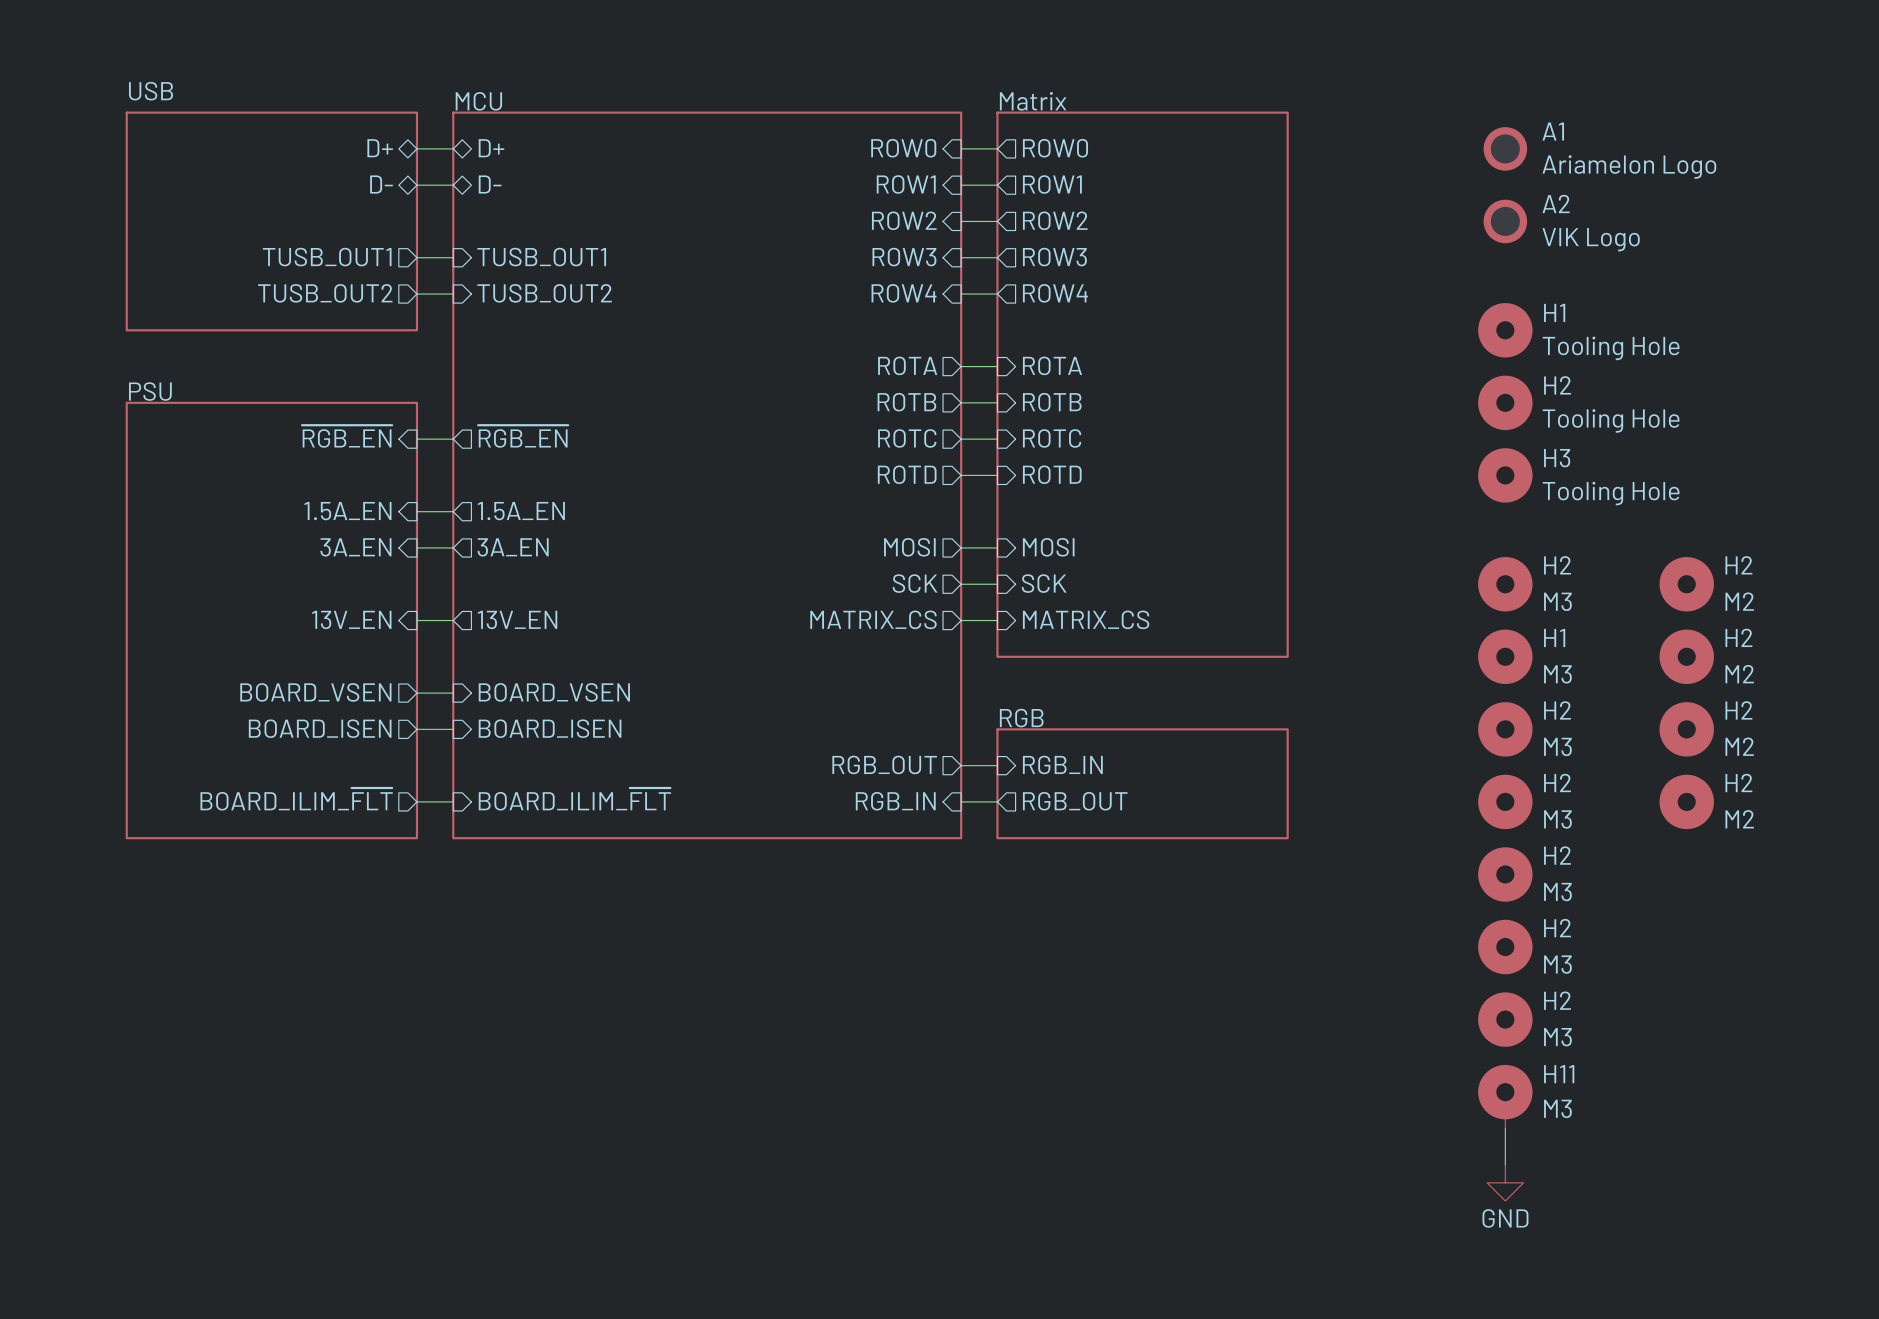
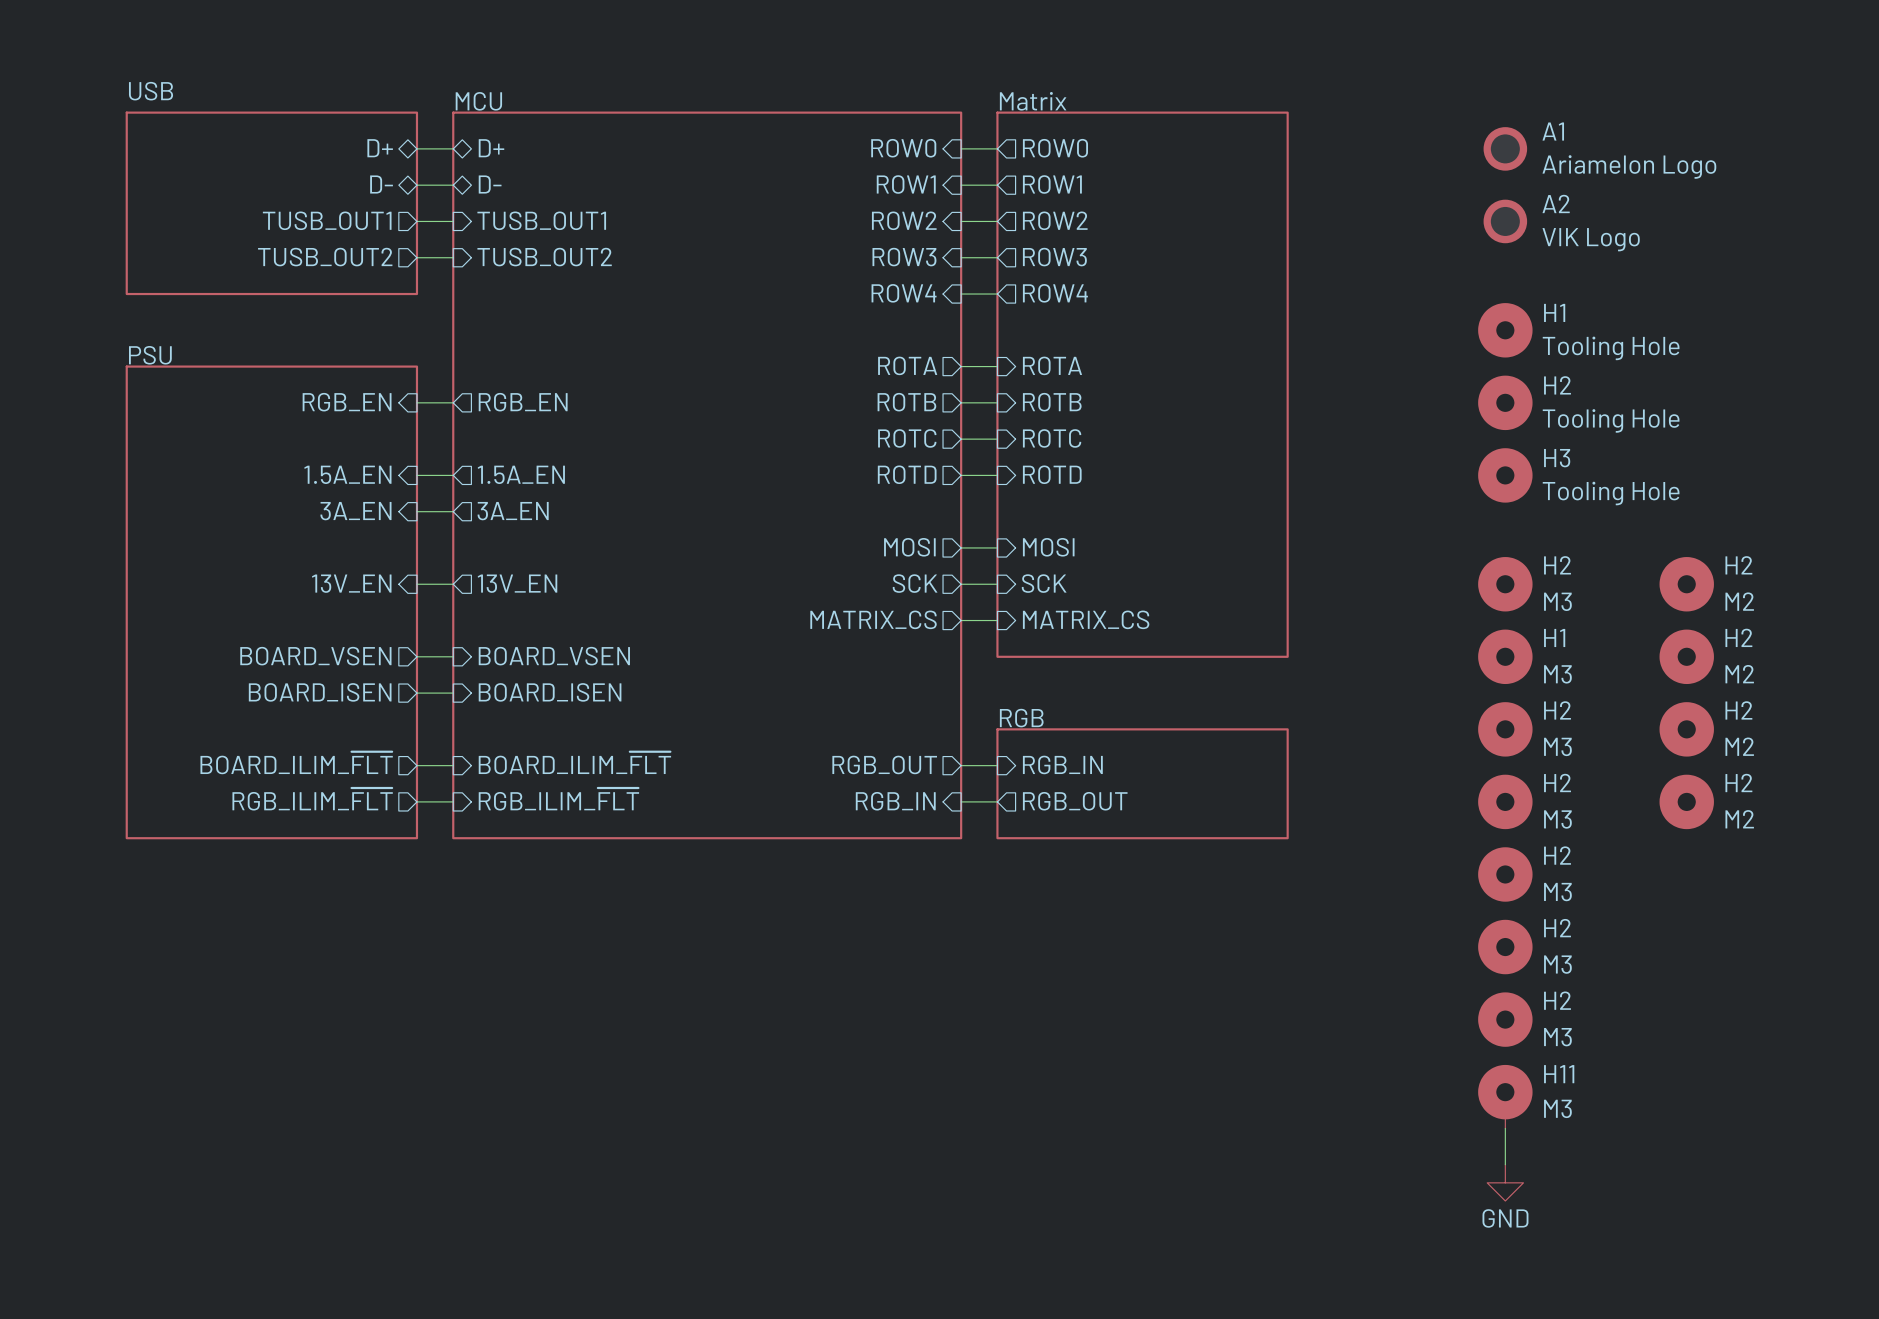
sheet USB: none -> (271, 203)
sheet pin: none -> TUSB_OUT1 (327, 220)
sheet pin: none -> TUSB_OUT1 (541, 220)
sheet USB: (271, 221) -> none
sheet pin: TUSB_OUT1 (327, 257) -> TUSB_OUT2 (325, 257)
sheet pin: TUSB_OUT1 (541, 257) -> TUSB_OUT2 (544, 257)
sheet pin: TUSB_OUT2 (325, 293) -> none
sheet pin: TUSB_OUT2 (544, 293) -> none
wire: (416, 294) (453, 294) -> (416, 221) (453, 221)
wire: none -> (416, 402) (453, 402)
sheet pin: ~{RGB_EN} (347, 436) -> RGB_EN (347, 402)
sheet pin: ~{RGB_EN} (523, 436) -> RGB_EN (523, 402)
wire: (416, 439) (453, 439) -> (416, 475) (453, 475)
sheet pin: none -> 1.5A_EN (347, 474)
sheet pin: none -> 1.5A_EN (521, 474)
sheet pin: 1.5A_EN (347, 511) -> 3A_EN (355, 511)
sheet pin: 1.5A_EN (521, 511) -> 3A_EN (513, 511)
sheet pin: 3A_EN (355, 547) -> none
wire: (416, 547) (453, 547) -> (416, 584) (453, 584)
sheet pin: 3A_EN (513, 547) -> none
sheet PSU: none -> (271, 602)
sheet pin position: 13V_EN (351, 619) -> 13V_EN (351, 583)
sheet pin position: 13V_EN (517, 619) -> 13V_EN (517, 583)
sheet PSU: (271, 620) -> none
wire: (416, 620) (453, 620) -> (416, 656) (453, 656)
sheet pin: none -> BOARD_VSEN (315, 656)
sheet pin: none -> BOARD_VSEN (554, 656)
sheet pin: BOARD_VSEN (315, 692) -> BOARD_ISEN (320, 692)
sheet pin: BOARD_VSEN (554, 692) -> BOARD_ISEN (550, 692)
sheet pin: BOARD_ISEN (320, 728) -> none
sheet pin: BOARD_ISEN (550, 728) -> none
wire: (416, 729) (453, 729) -> (416, 765) (453, 765)
sheet pin: none -> BOARD_ILIM_~{FLT} (296, 762)
sheet pin: none -> BOARD_ILIM_~{FLT} (574, 762)
sheet pin: BOARD_ILIM_~{FLT} (296, 799) -> RGB_ILIM_~{FLT} (312, 799)
sheet pin: BOARD_ILIM_~{FLT} (574, 799) -> RGB_ILIM_~{FLT} (558, 799)

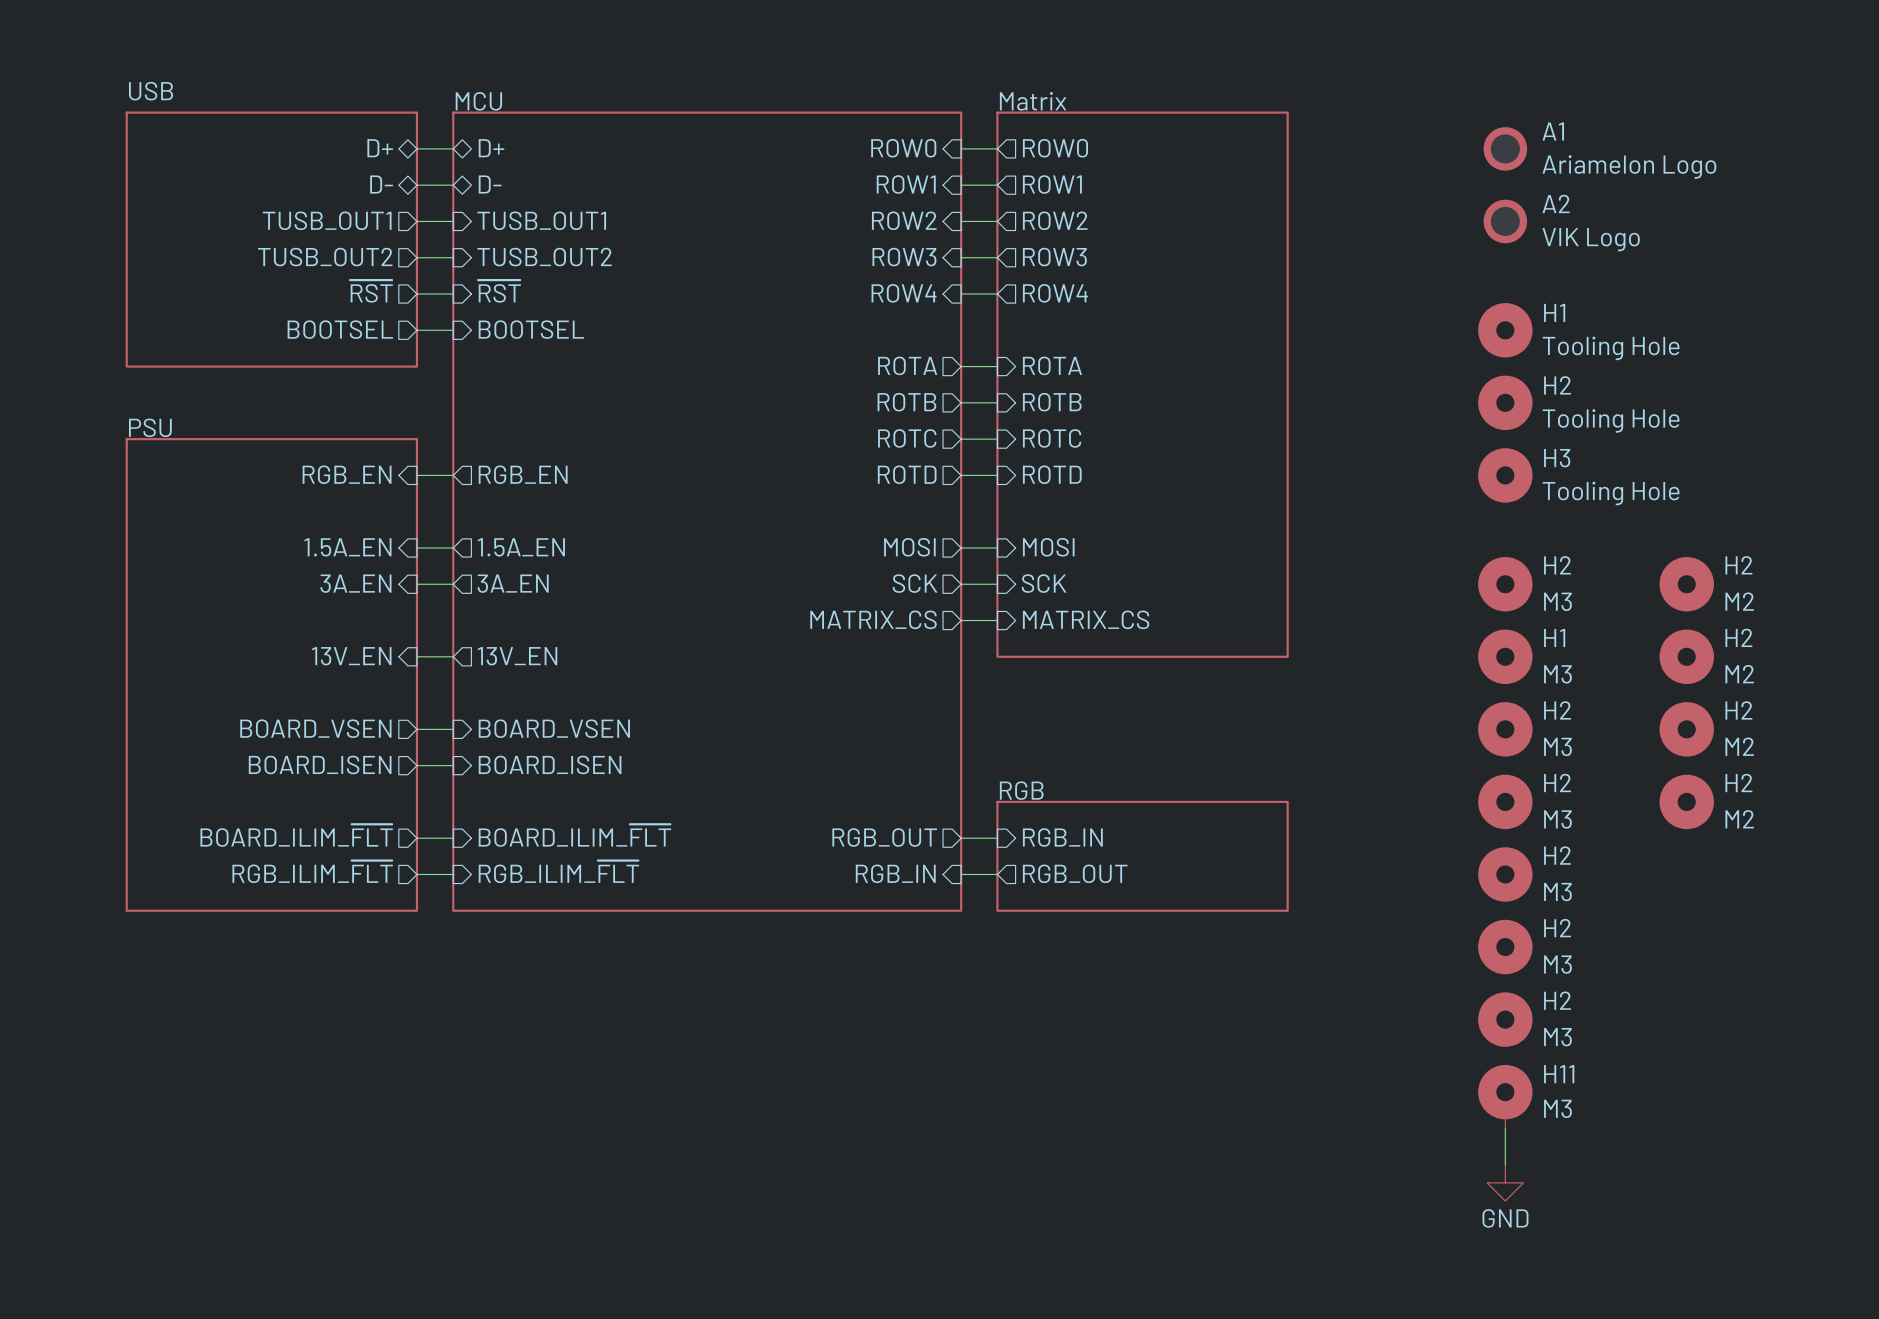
sheet USB: (271, 203) -> none
sheet USB: none -> (271, 239)
sheet pin: none -> ~{RST} (371, 291)
sheet pin: none -> ~{RST} (499, 291)
wire: none -> (416, 294) (453, 294)
sheet pin: none -> BOOTSEL (340, 329)
sheet pin: none -> BOOTSEL (531, 329)
sheet pin: RGB_EN (347, 402) -> none
wire: (416, 402) (453, 402) -> (416, 330) (453, 330)
sheet pin: RGB_EN (523, 402) -> none
sheet pin: 1.5A_EN (347, 474) -> RGB_EN (347, 474)
sheet pin: 1.5A_EN (521, 474) -> RGB_EN (523, 474)
sheet MCU: (707, 475) -> none
sheet pin: 3A_EN (355, 511) -> 1.5A_EN (347, 547)
wire: (416, 511) (453, 511) -> (416, 547) (453, 547)
sheet pin: 3A_EN (513, 511) -> 1.5A_EN (521, 547)
sheet MCU: none -> (707, 511)
sheet pin: 13V_EN (351, 583) -> 3A_EN (355, 583)
sheet pin: 13V_EN (517, 583) -> 3A_EN (513, 583)
sheet PSU position: (271, 602) -> (271, 674)
sheet pin shape: output (315, 656) -> input (351, 656)
sheet pin: BOARD_VSEN (315, 656) -> 13V_EN (351, 656)
sheet pin shape: input (554, 656) -> output (517, 656)
sheet pin: BOARD_VSEN (554, 656) -> 13V_EN (517, 656)
sheet pin: BOARD_ISEN (320, 692) -> BOARD_VSEN (315, 728)
sheet pin: BOARD_ISEN (550, 692) -> BOARD_VSEN (554, 728)
wire: (416, 693) (453, 693) -> (416, 729) (453, 729)
sheet pin: BOARD_ILIM_~{FLT} (296, 762) -> BOARD_ISEN (320, 764)
sheet pin: BOARD_ILIM_~{FLT} (574, 762) -> BOARD_ISEN (550, 764)
sheet pin: RGB_OUT (884, 764) -> none
sheet pin: RGB_IN (1062, 764) -> none
wire: (961, 765) (997, 765) -> (961, 874) (997, 874)
sheet RGB position: (1142, 783) -> (1142, 856)
sheet pin: RGB_ILIM_~{FLT} (312, 799) -> BOARD_ILIM_~{FLT} (296, 835)
sheet pin: RGB_ILIM_~{FLT} (558, 799) -> BOARD_ILIM_~{FLT} (574, 835)
wire: (416, 801) (453, 801) -> (416, 838) (453, 838)
sheet pin shape: input (895, 801) -> output (884, 837)
sheet pin: RGB_IN (895, 801) -> RGB_OUT (884, 837)
wire: (961, 801) (997, 801) -> (961, 838) (997, 838)
sheet pin shape: output (1075, 801) -> input (1062, 837)
sheet pin: RGB_OUT (1075, 801) -> RGB_IN (1062, 837)
sheet pin: none -> RGB_ILIM_~{FLT} (312, 871)
sheet pin: none -> RGB_ILIM_~{FLT} (558, 871)
sheet pin: none -> RGB_IN (895, 873)
sheet pin: none -> RGB_OUT (1075, 873)
wire: none -> (416, 874) (453, 874)

